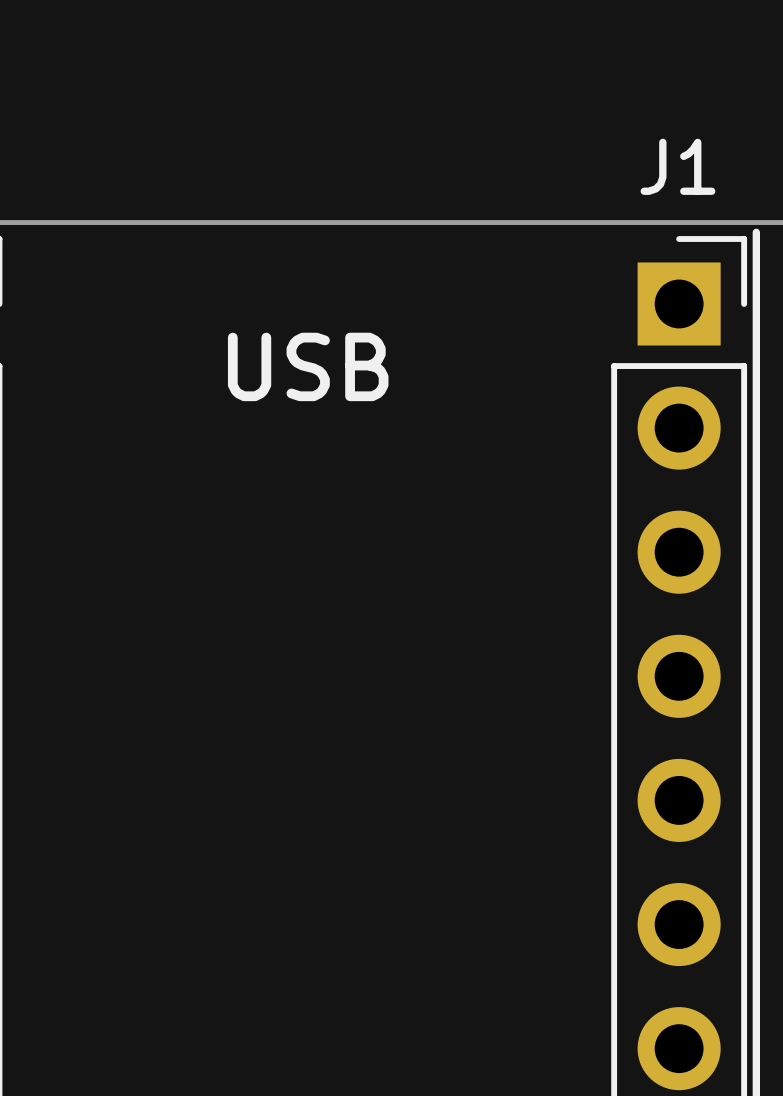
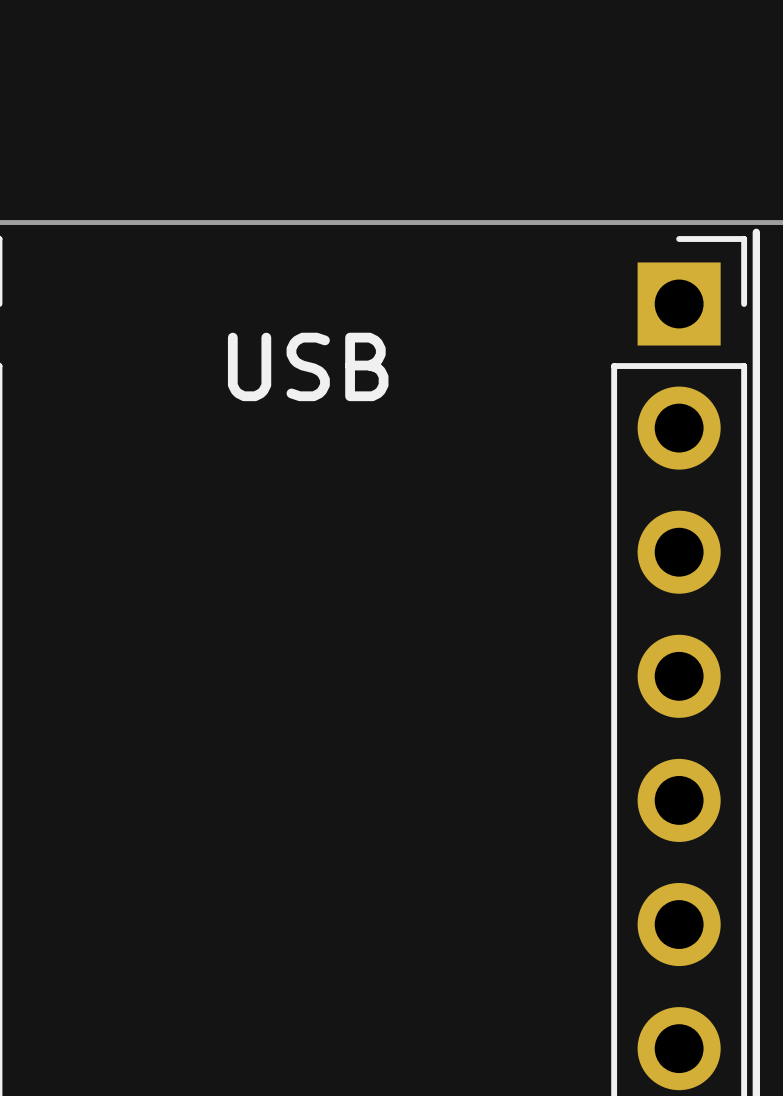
J1 name: J1 (677, 166) -> none

